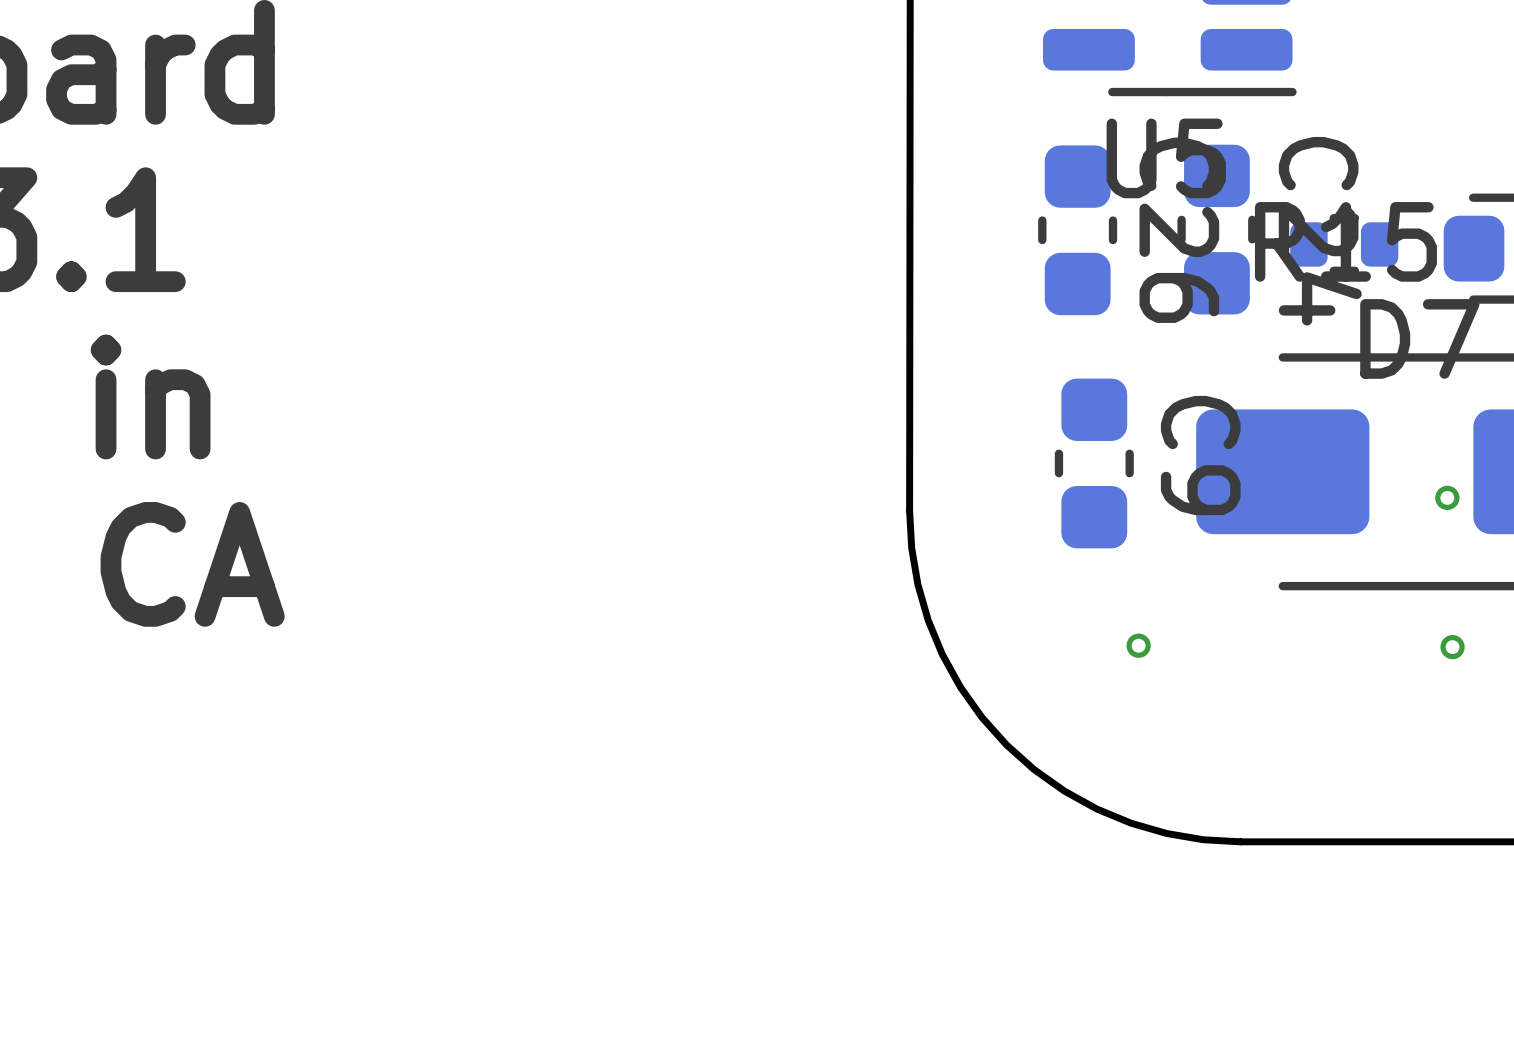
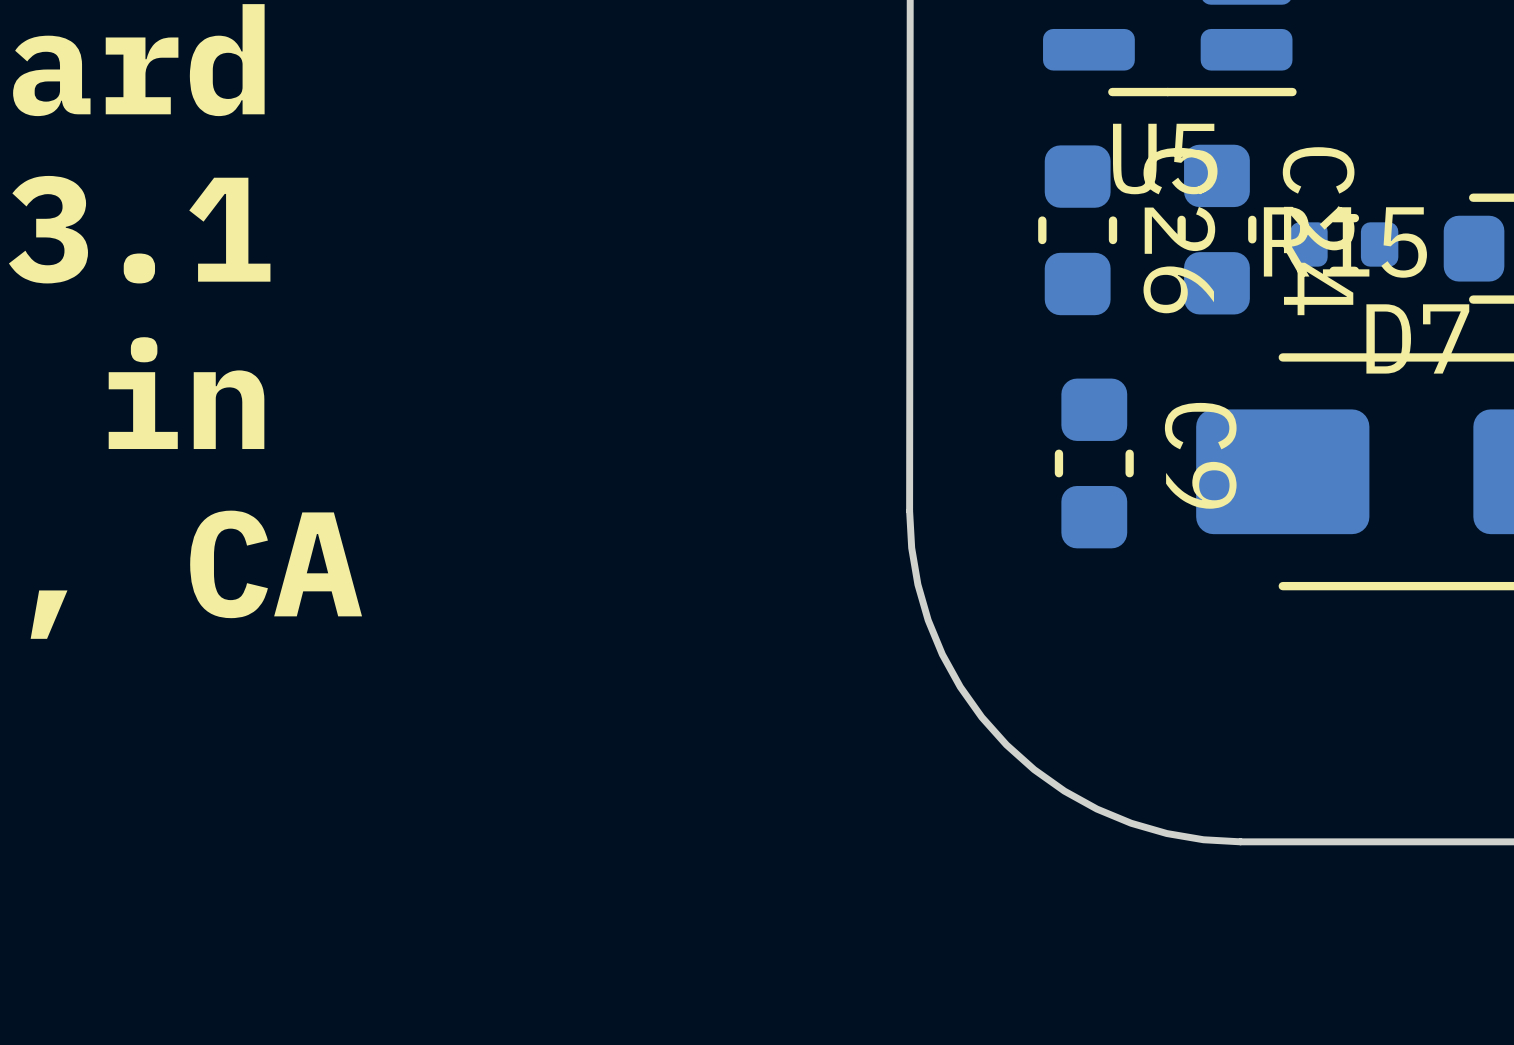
via: (1447, 497) -> none
via: (1138, 645) -> none
via: (1452, 647) -> none

